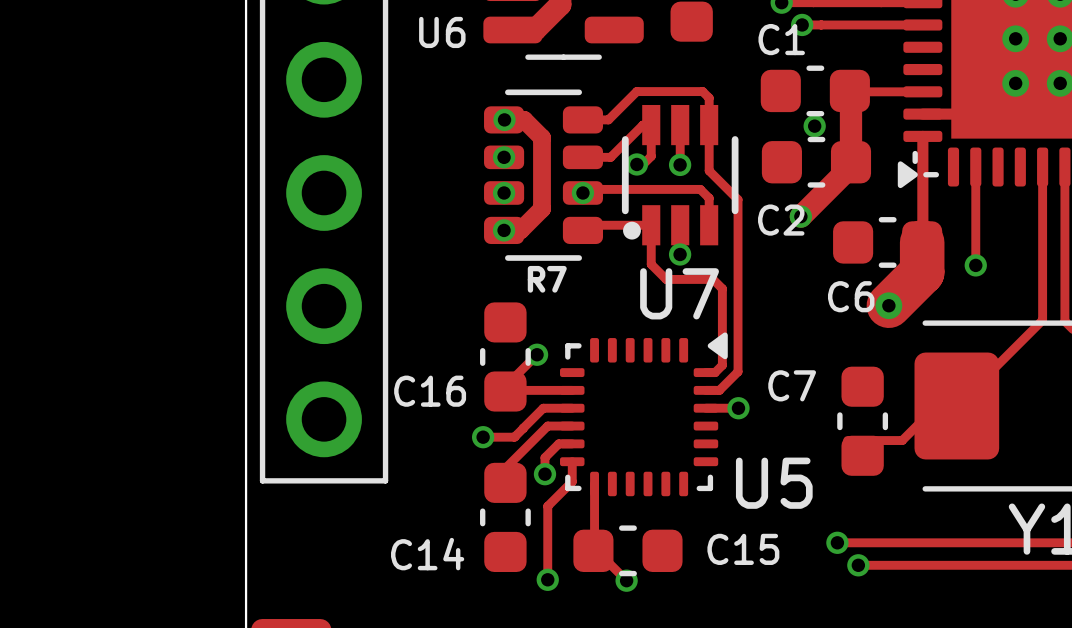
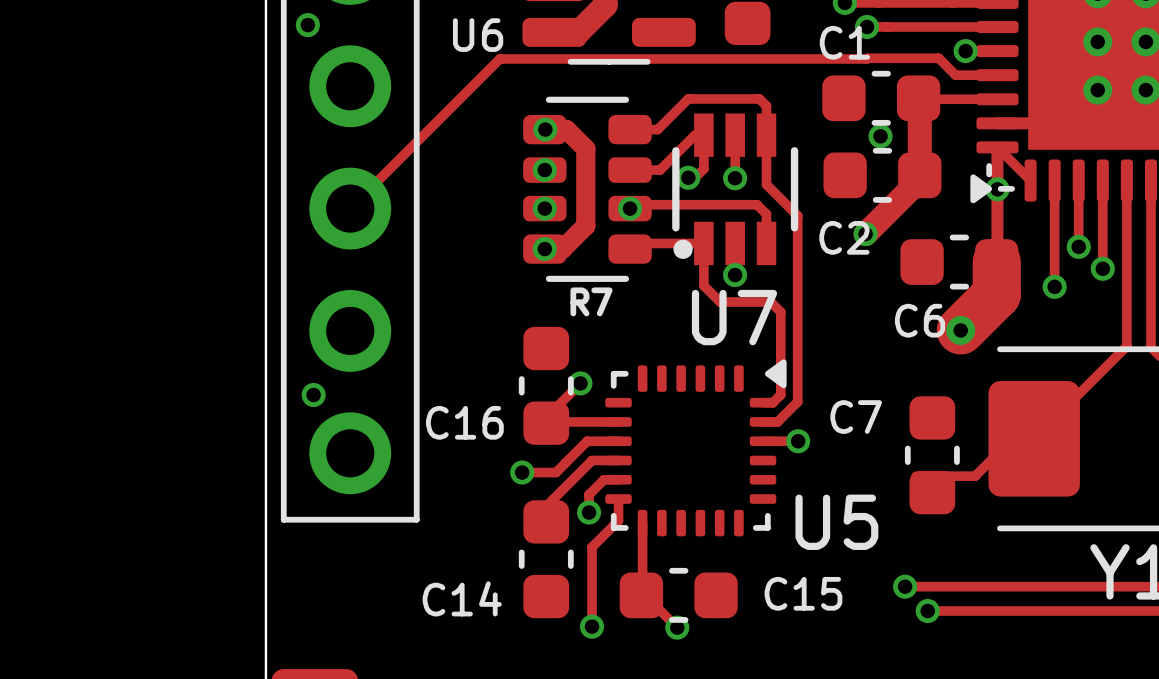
via: none -> (307, 25)
via: none -> (965, 51)
track: none -> (997, 75) (955, 75) (938, 58) (499, 58) (350, 208)
track: none -> (997, 147) (1030, 180)
track: none -> (1078, 180) (1078, 246)
track: none -> (1102, 180) (1102, 268)
via: none -> (997, 189)
via: none -> (1078, 246)
via: none -> (1102, 268)
via: none -> (313, 394)

